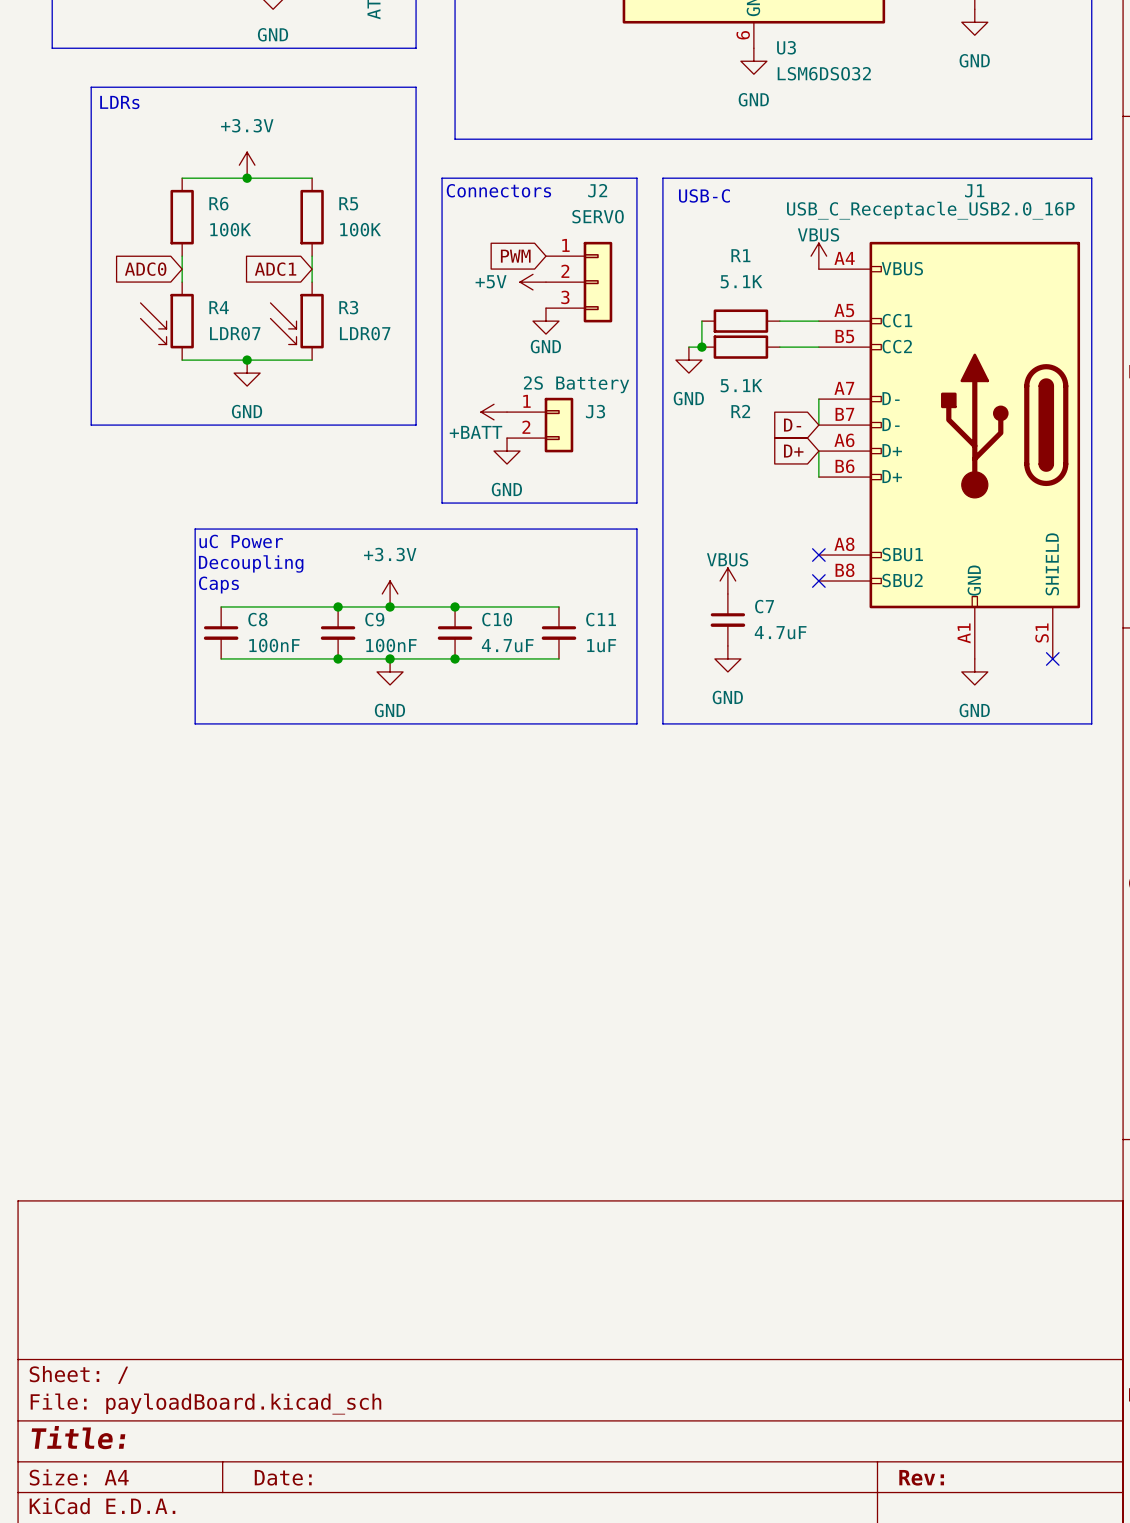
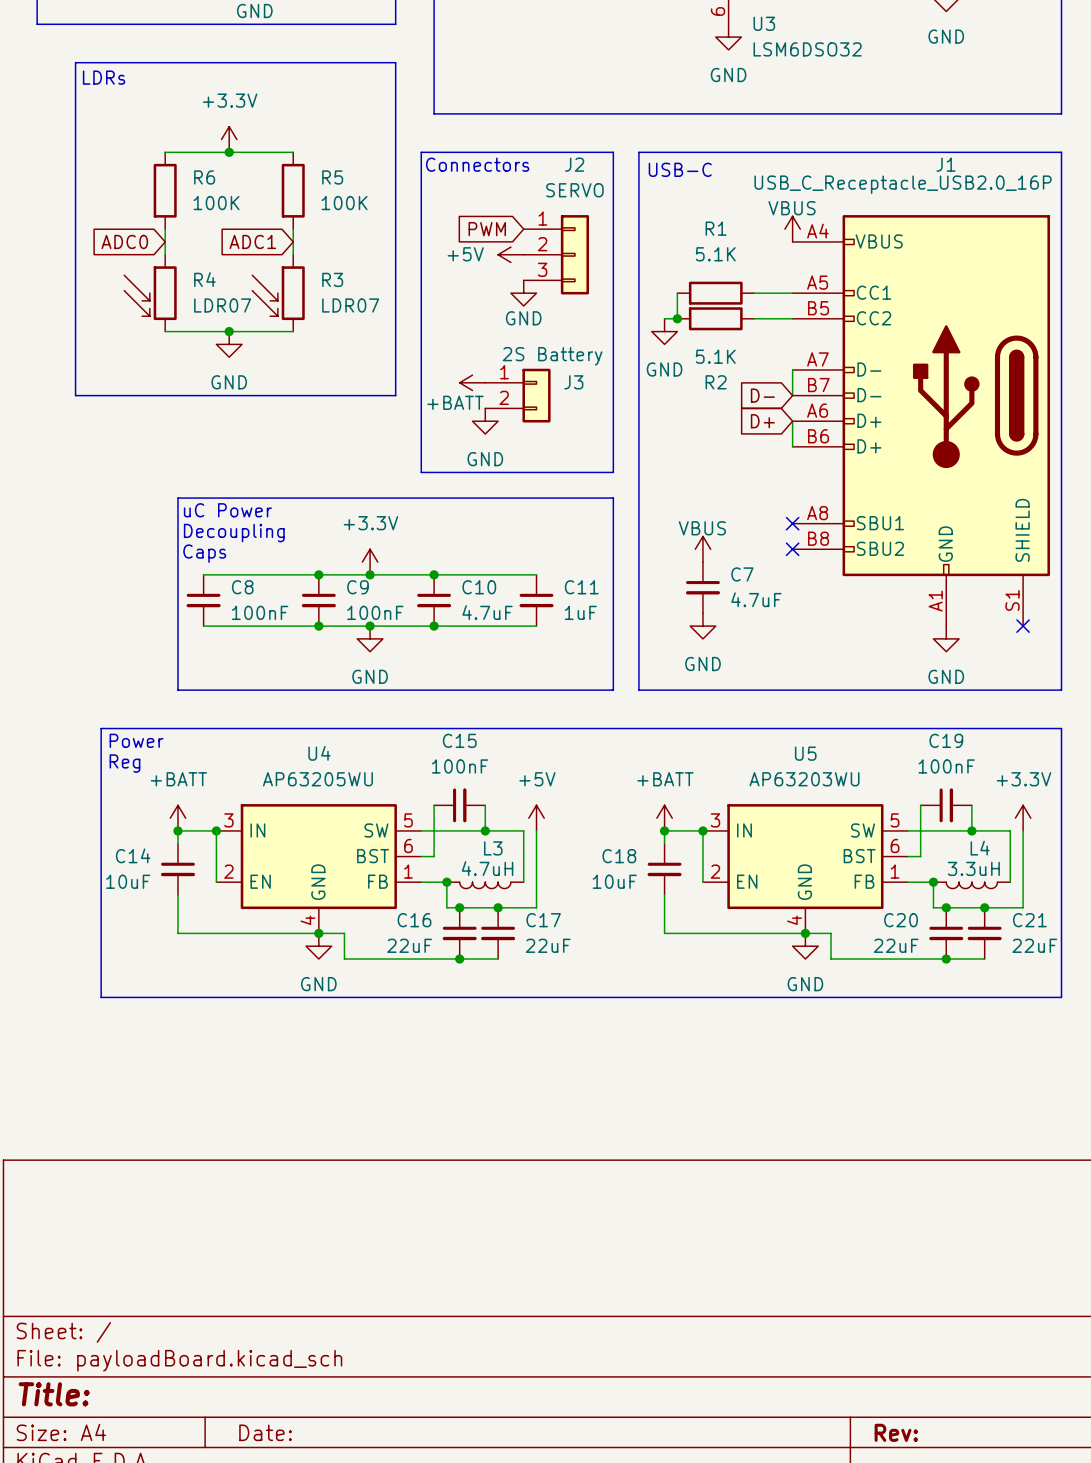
line: none -> (101, 728) (1061, 728) (1061, 997) (101, 997) (101, 728)
text: none -> Power (136, 740)
text: none -> Reg (124, 763)
wire: none -> (434, 805) (434, 856) (421, 856)
C15: none -> 100nF (459, 805)
wire: none -> (485, 805) (485, 830)
wire: none -> (920, 805) (920, 856) (907, 856)
C19: none -> 100nF (946, 805)
wire: none -> (971, 805) (971, 830)
power symbol: none -> +BATT (177, 818)
power symbol: none -> +5V (536, 818)
power symbol: none -> +BATT (664, 818)
power symbol: none -> +3.3V (1023, 818)
junction: none -> (177, 830)
junction: none -> (216, 830)
wire: none -> (421, 830) (523, 830) (523, 882)
junction: none -> (485, 830)
wire: none -> (536, 830) (536, 907) (446, 907) (446, 882) (421, 882)
junction: none -> (664, 830)
junction: none -> (702, 830)
wire: none -> (907, 830) (1010, 830) (1010, 882)
junction: none -> (971, 830)
wire: none -> (1023, 830) (1023, 907) (933, 907) (933, 882) (907, 882)
wire: none -> (177, 843) (177, 830) (216, 830) (216, 882)
wire: none -> (664, 843) (664, 830) (702, 830) (702, 882)
C14: none -> 10uF (177, 869)
U4: none -> AP63205WU (318, 868)
C18: none -> 10uF (664, 869)
U5: none -> AP63203WU (805, 868)
junction: none -> (446, 882)
junction: none -> (933, 882)
L3: none -> 4.7uH (485, 885)
L4: none -> 3.3uH (971, 885)
wire: none -> (177, 894) (177, 933) (344, 933) (344, 959) (498, 959)
wire: none -> (664, 894) (664, 933) (831, 933) (831, 959) (984, 959)
junction: none -> (459, 907)
junction: none -> (498, 907)
junction: none -> (946, 907)
junction: none -> (984, 907)
junction: none -> (318, 933)
C16: none -> 22uF (459, 933)
C17: none -> 22uF (498, 933)
junction: none -> (805, 933)
C20: none -> 22uF (946, 933)
C21: none -> 22uF (984, 933)
power symbol: none -> GND (318, 946)
power symbol: none -> GND (805, 946)
junction: none -> (459, 959)
junction: none -> (946, 959)

